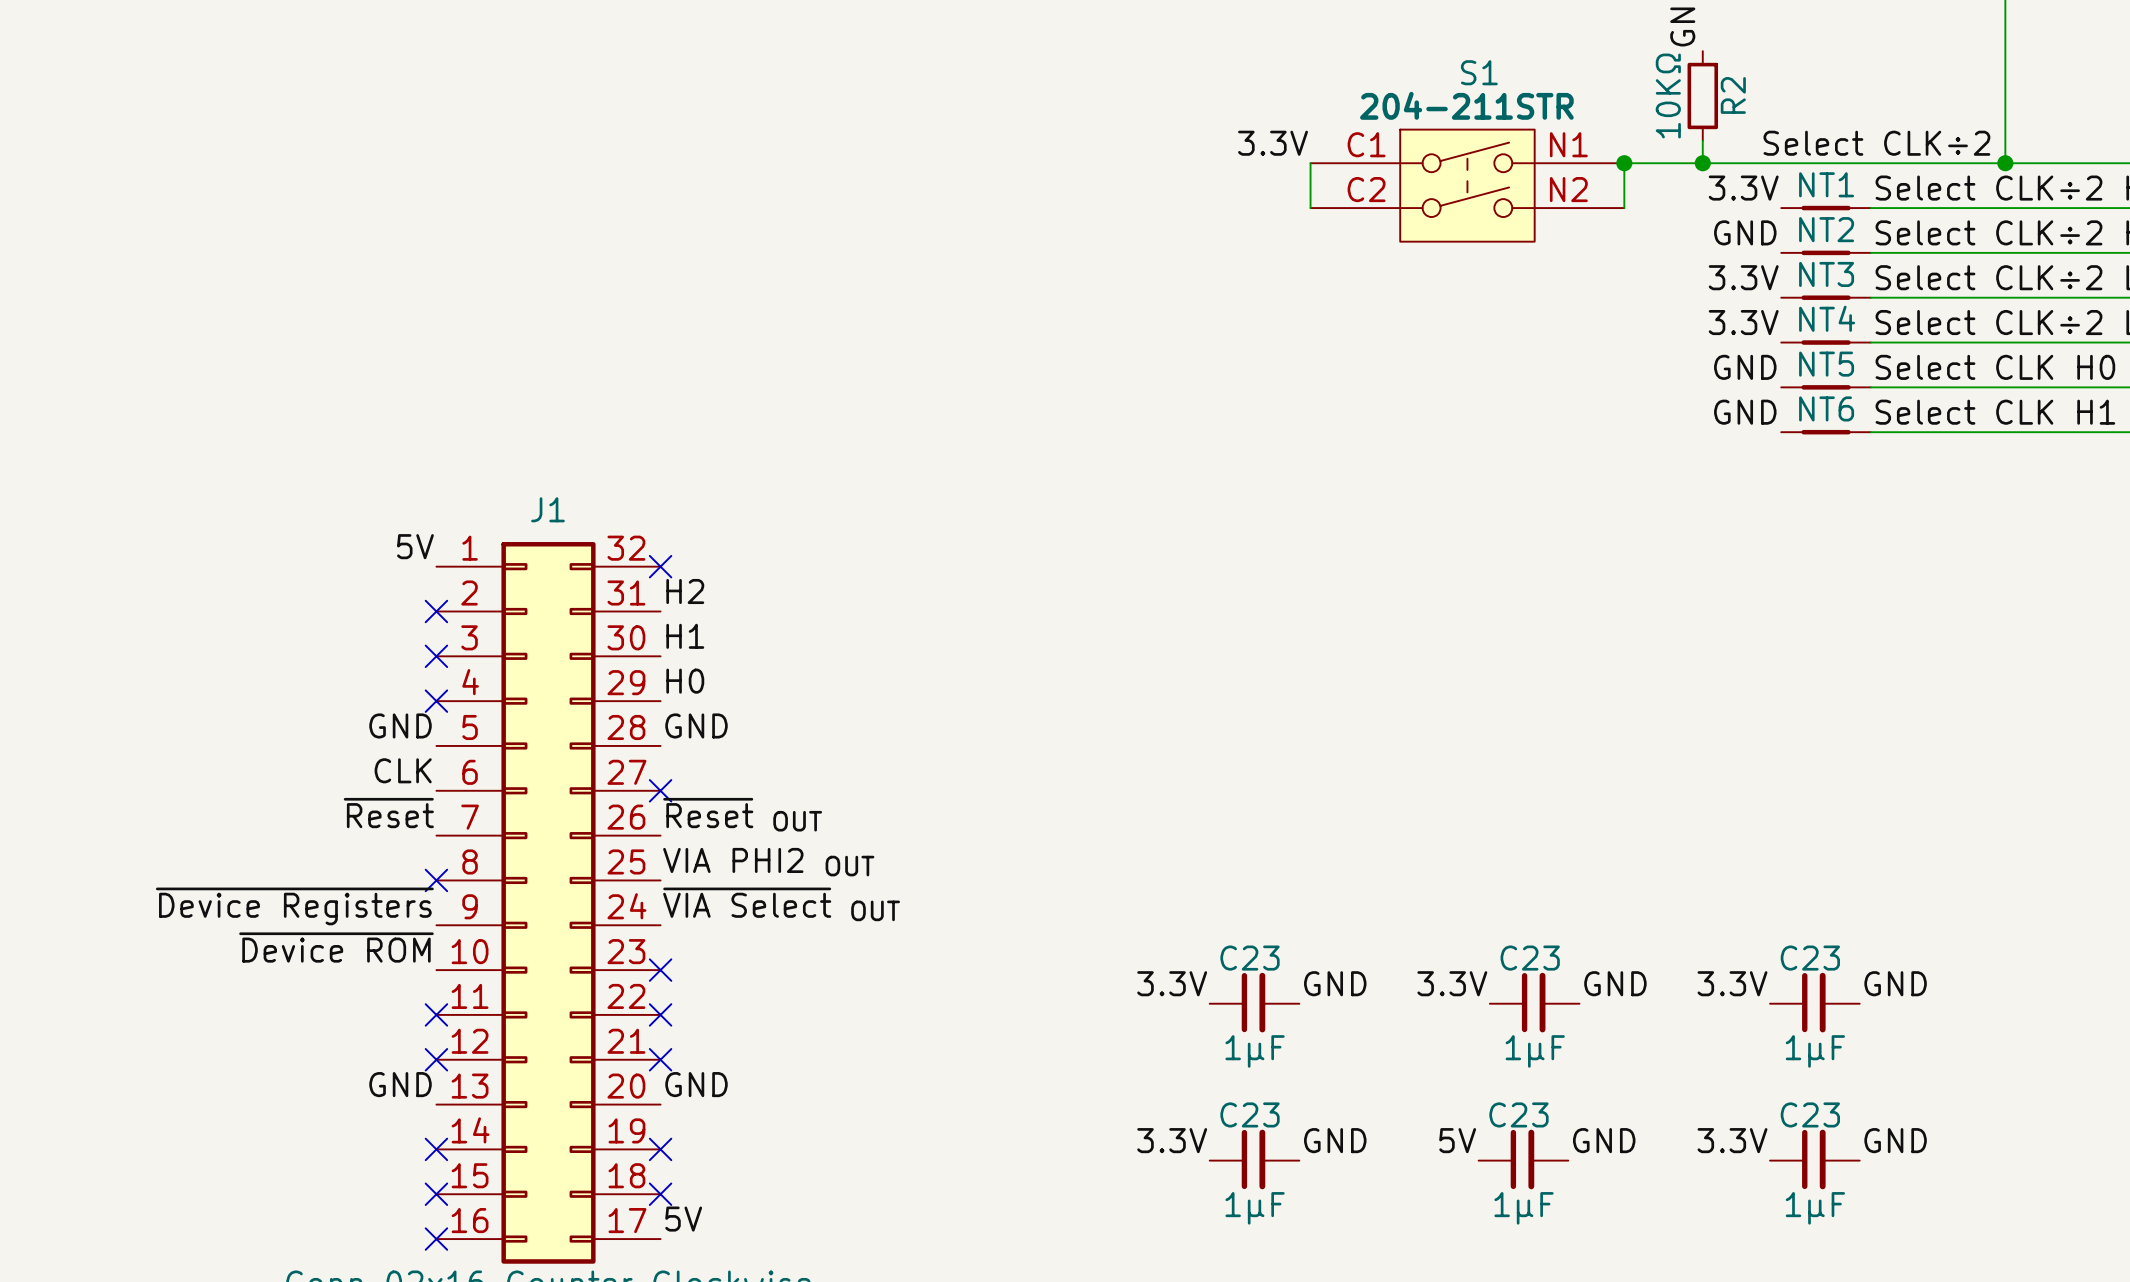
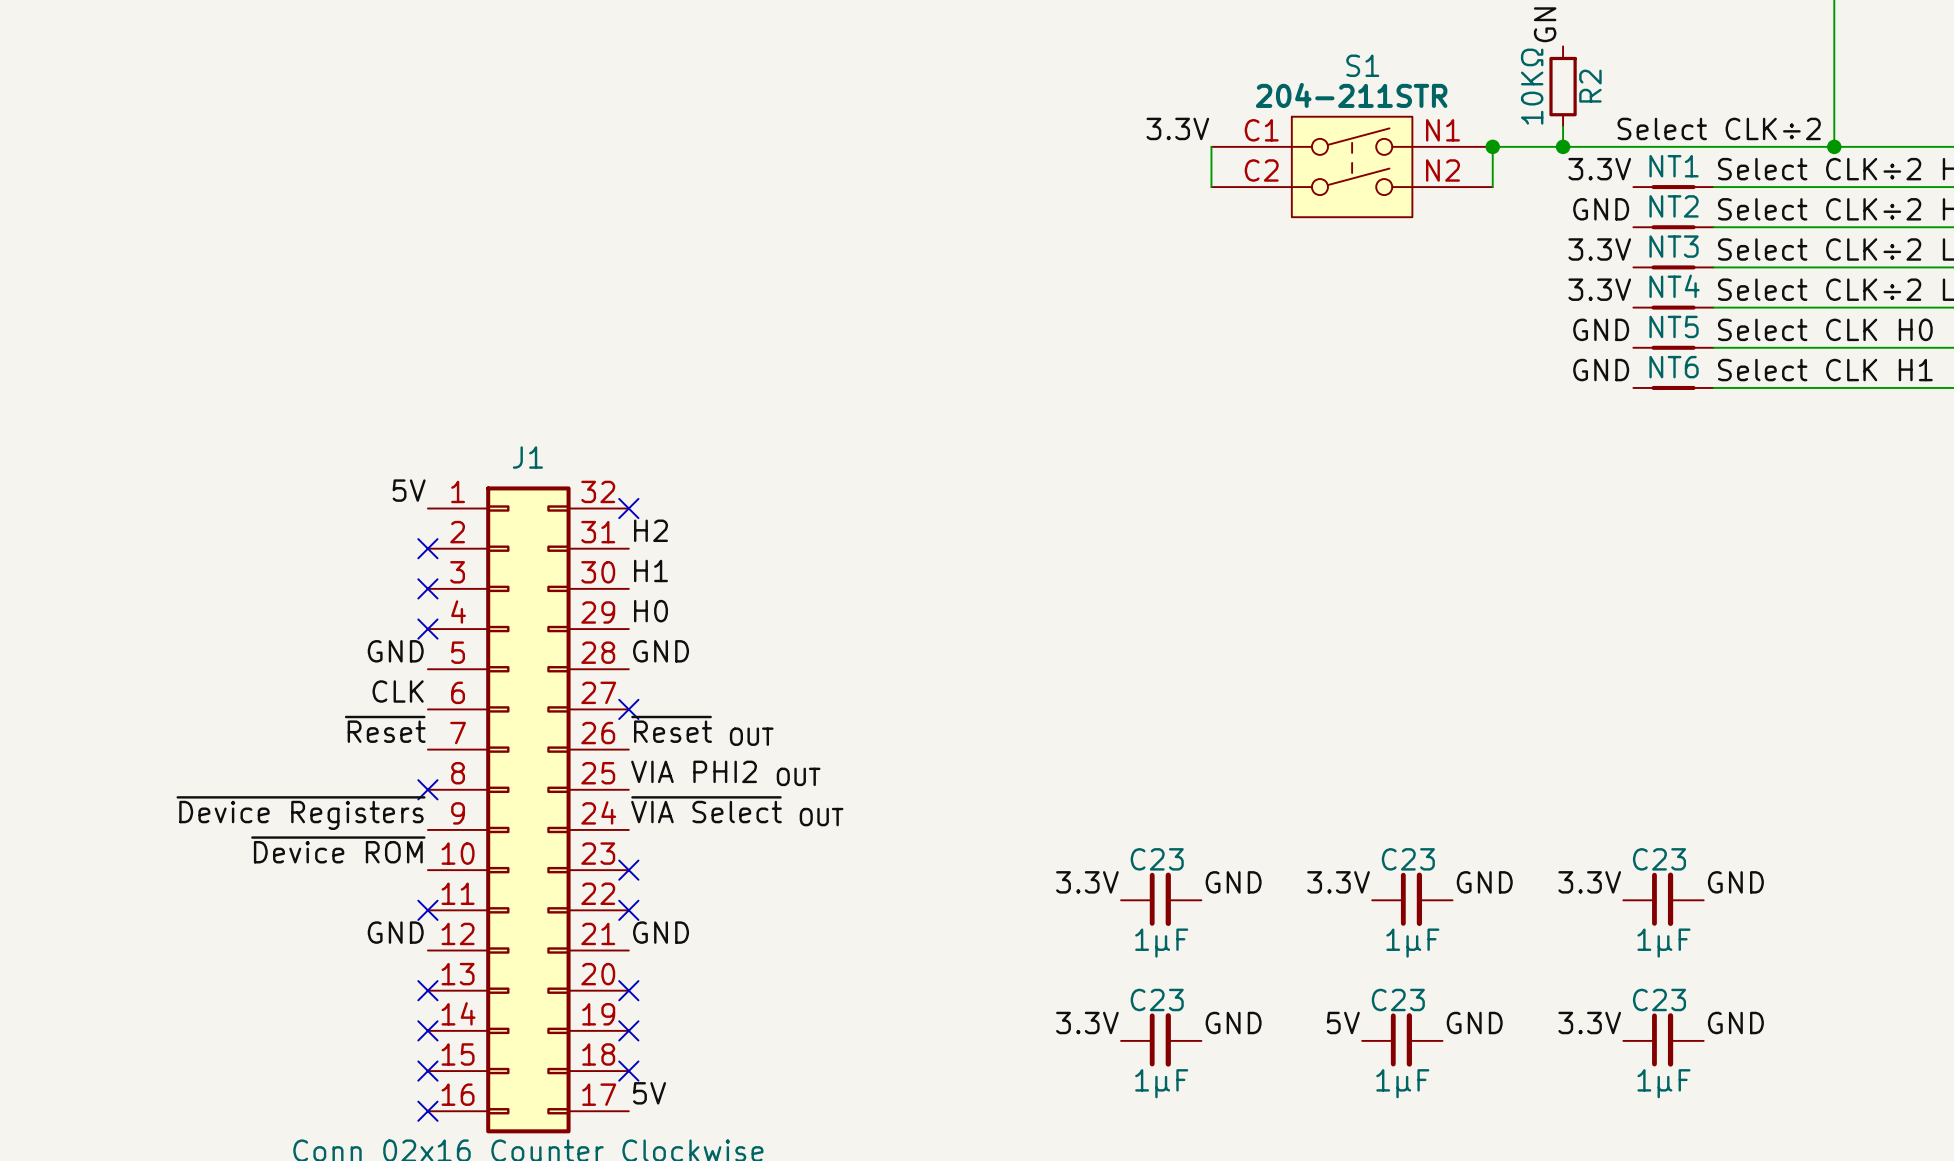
no-connect mark position: (436, 1059) -> (427, 990)
no-connect mark position: (660, 1059) -> (628, 990)
label position: GND (400, 1084) -> GND (395, 932)
label position: GND (696, 1084) -> GND (661, 932)

